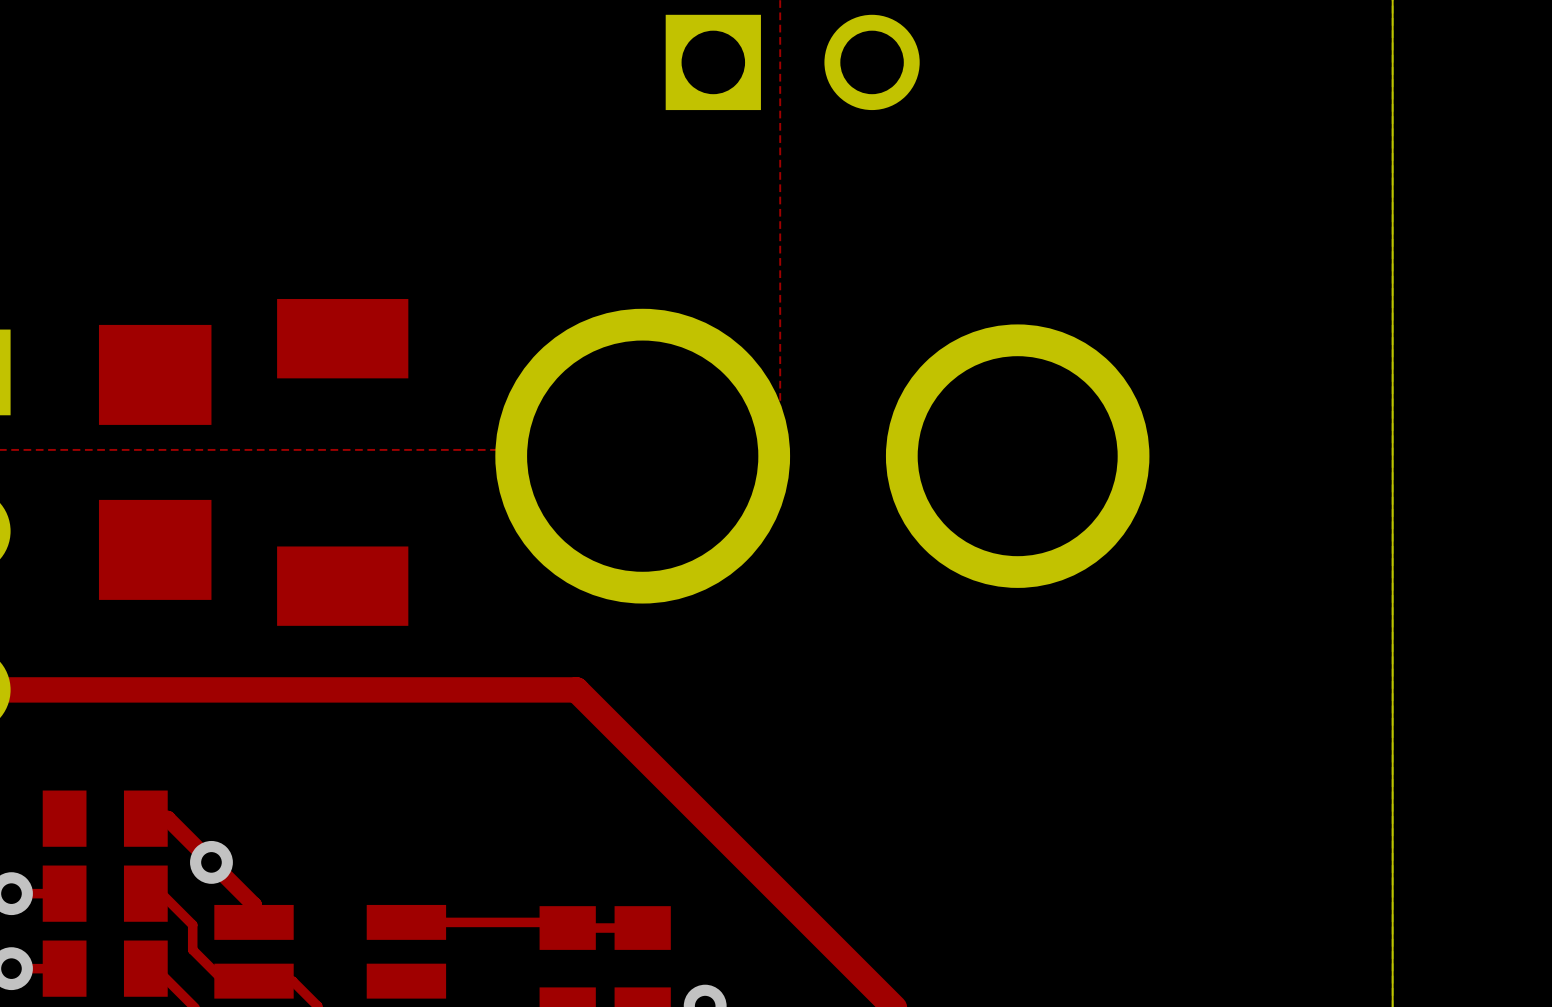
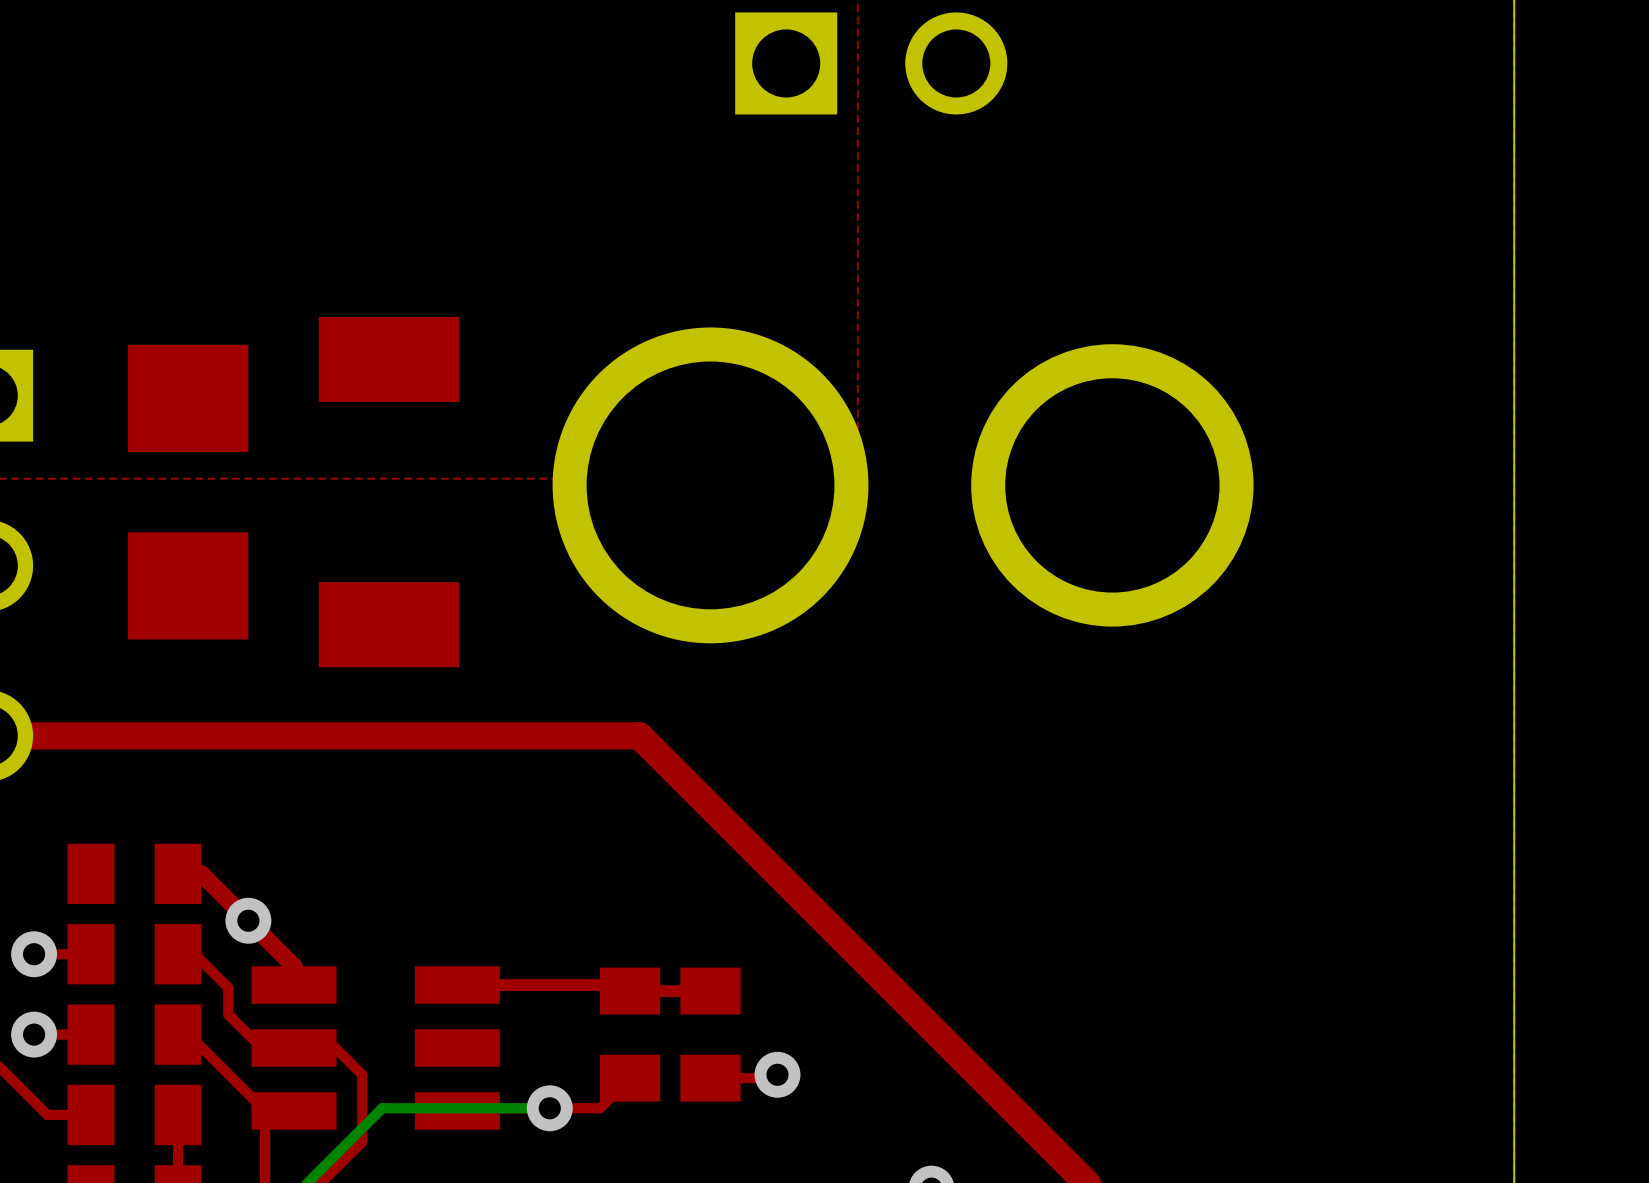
top track width: thin (406, 922) (562, 922) (567, 928) (642, 928) -> thick (457, 985) (624, 985) (630, 991) (710, 991)

